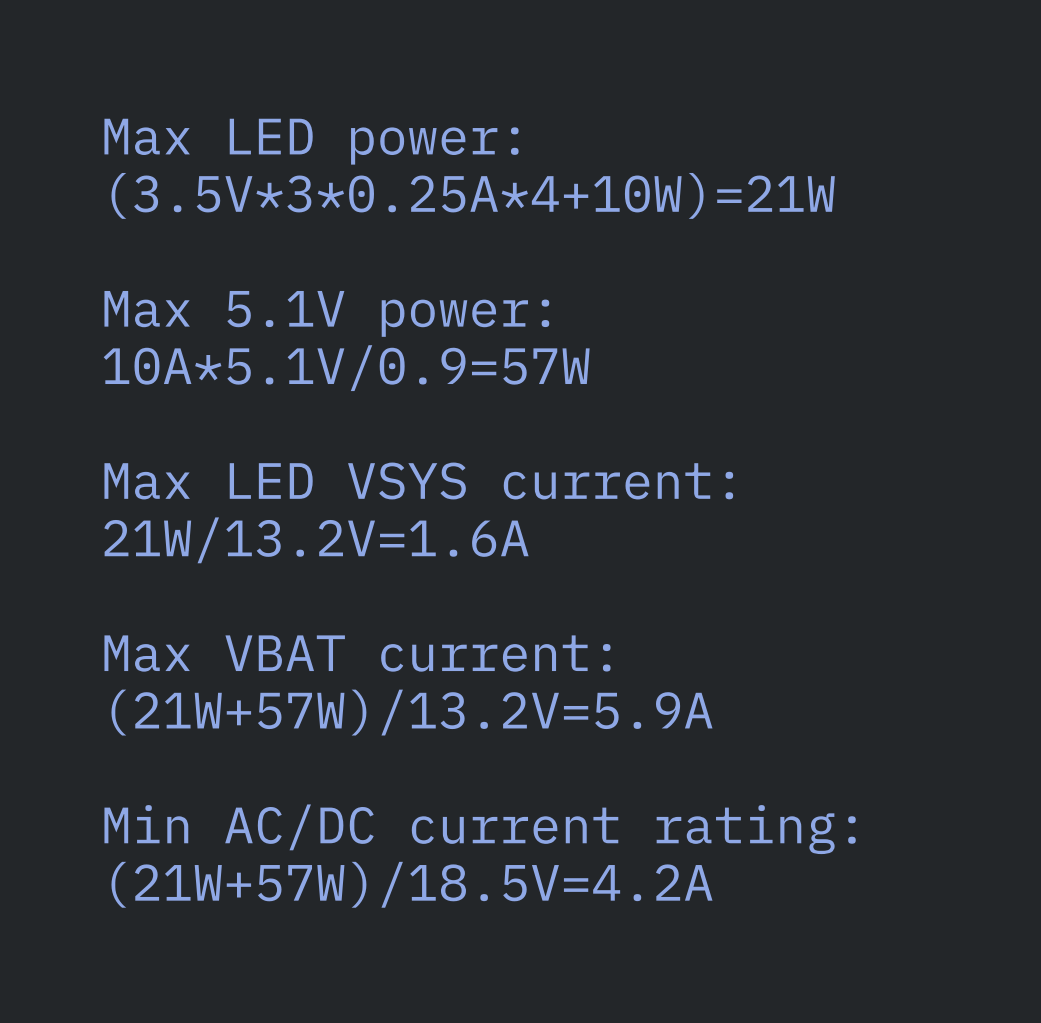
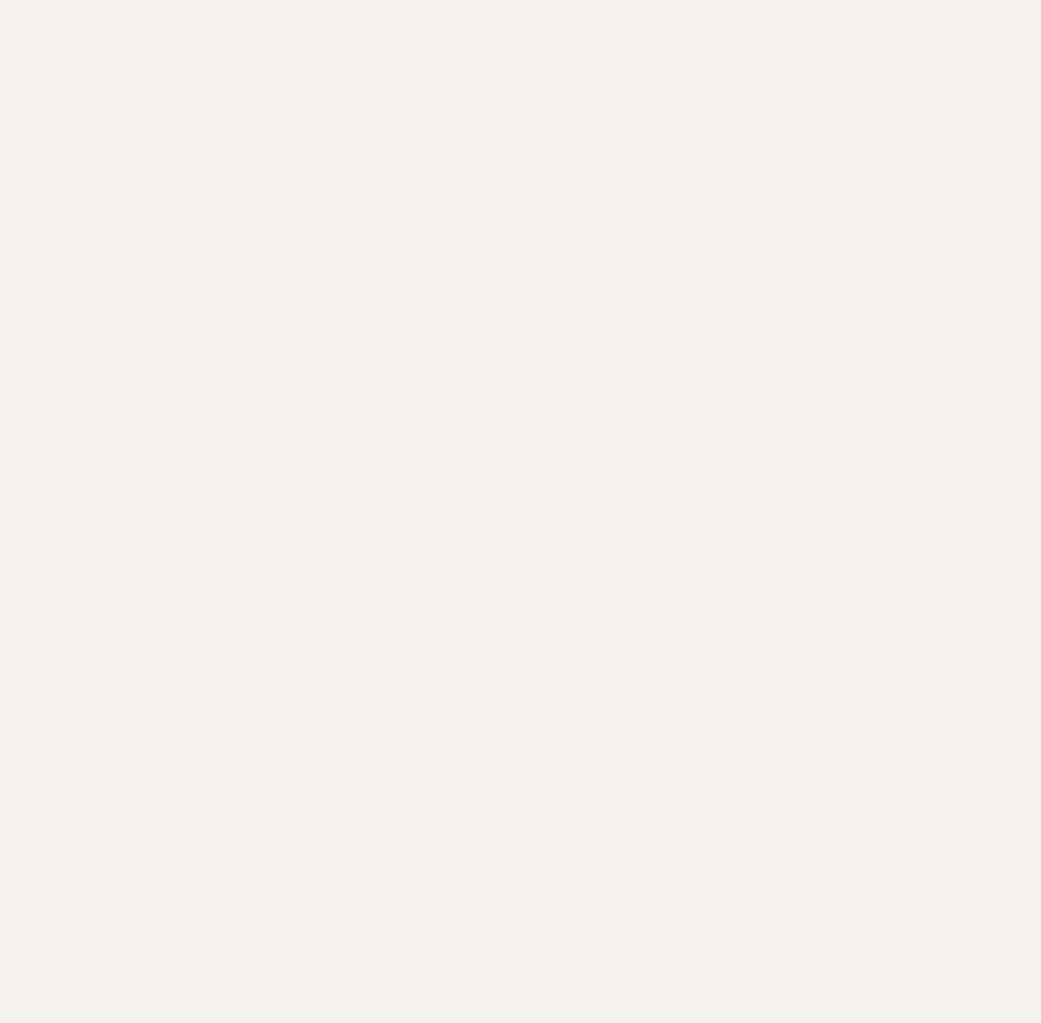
text: Max LED power: (311, 141) -> none
text: (3.5V*3*0.25A*4+10W)=21W (473, 195) -> none
text: Max 5.1V power: (326, 313) -> none
text: 10A*5.1V/0.9=57W (346, 368) -> none
text: Max LED VSYS current: (418, 481) -> none
text: 21W/13.2V=1.6A (316, 540) -> none
text: Max VBAT current: (357, 653) -> none
text: (21W+57W)/13.2V=5.9A (411, 712) -> none
text: Min AC/DC current rating: (480, 829) -> none
text: (21W+57W)/18.5V=4.2A (411, 884) -> none

